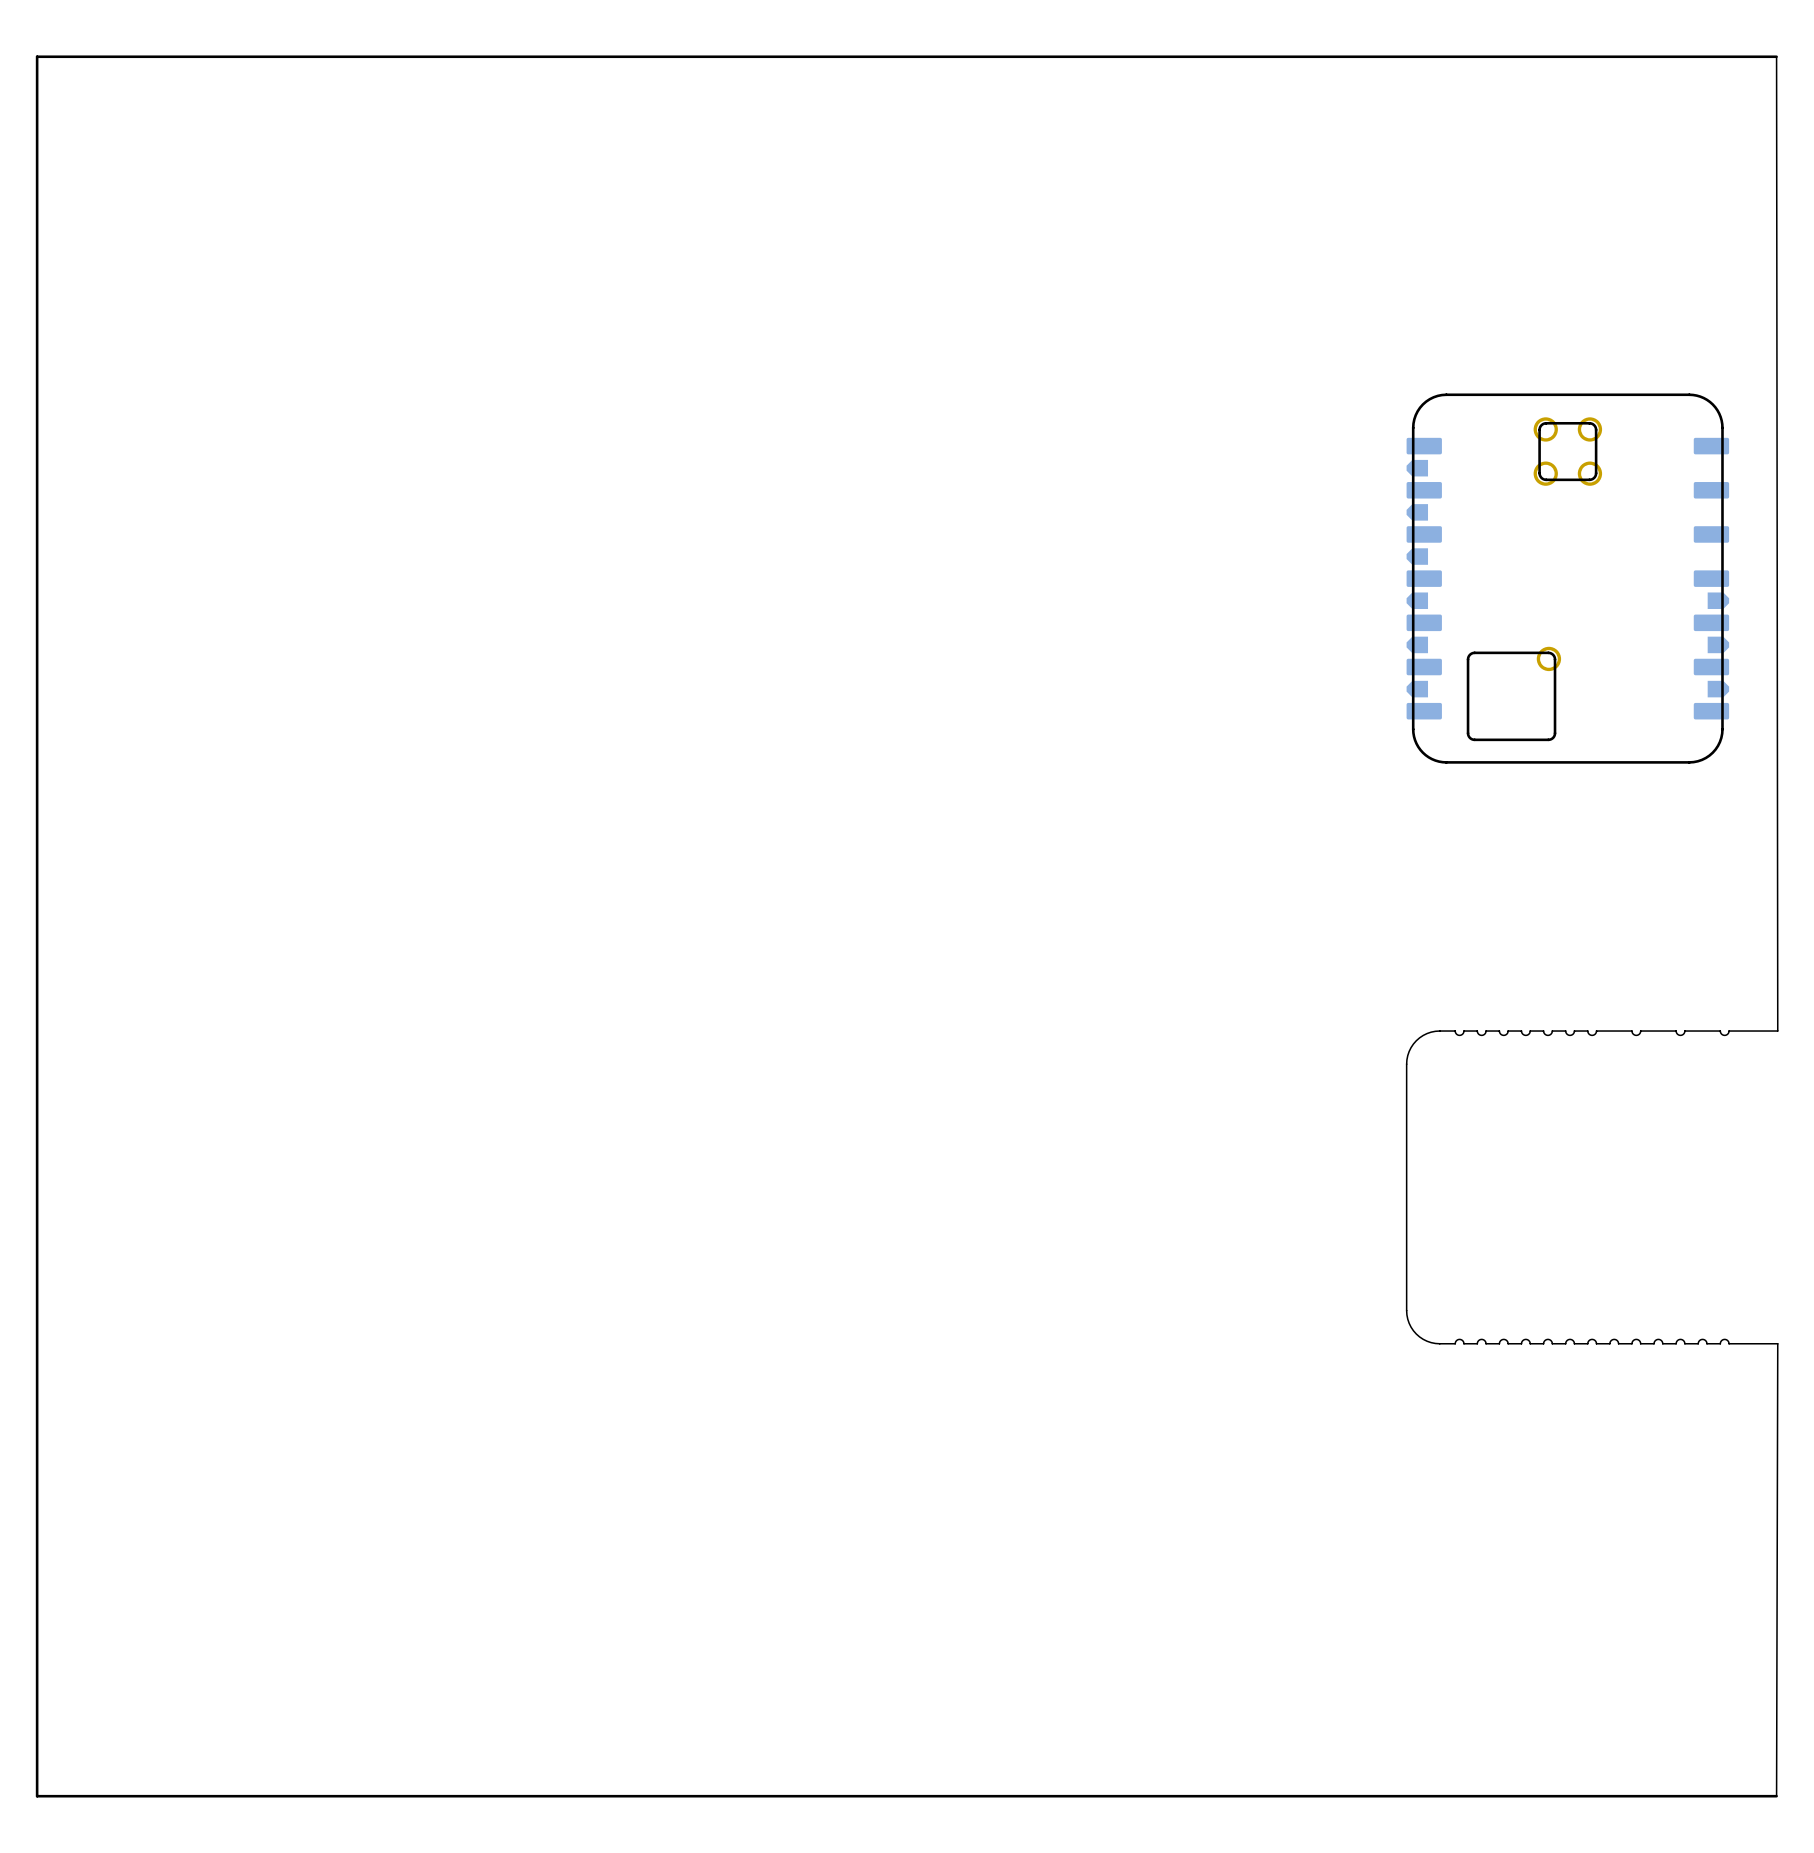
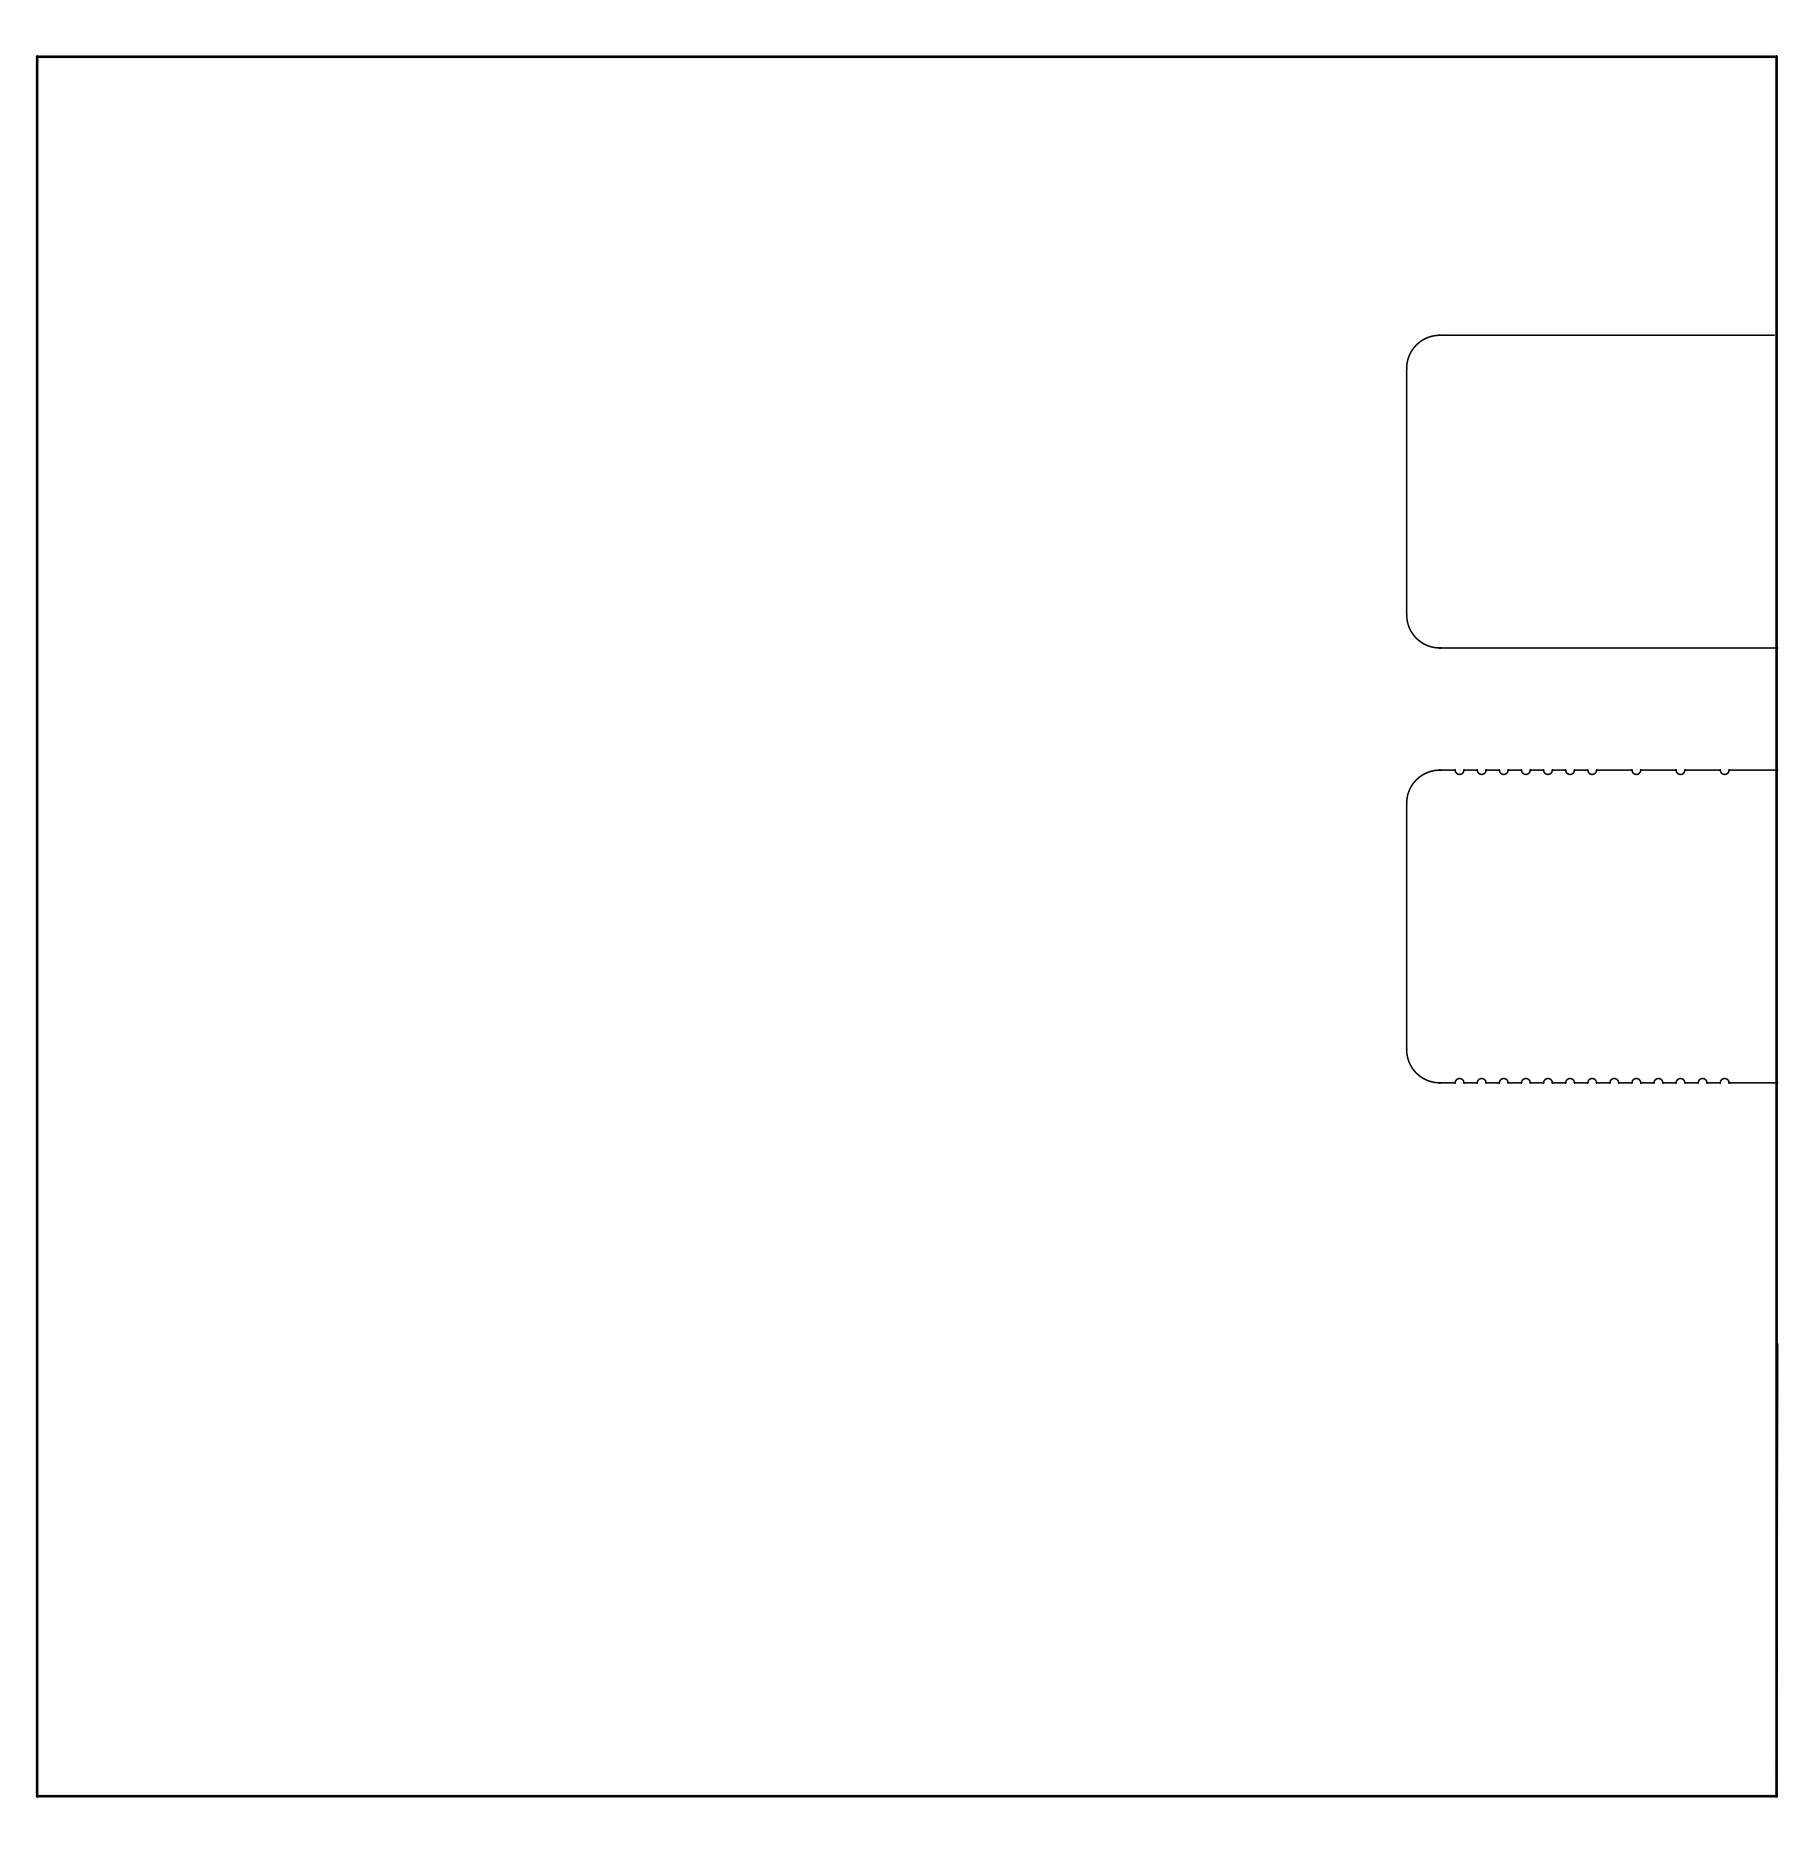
board edge: (1776, 56) (1777, 1031) -> (1776, 56) (1776, 1796)
part: none -> (1592, 491)
part: (1567, 578) -> none
part: none -> (1592, 926)
part: (1592, 1187) -> none

